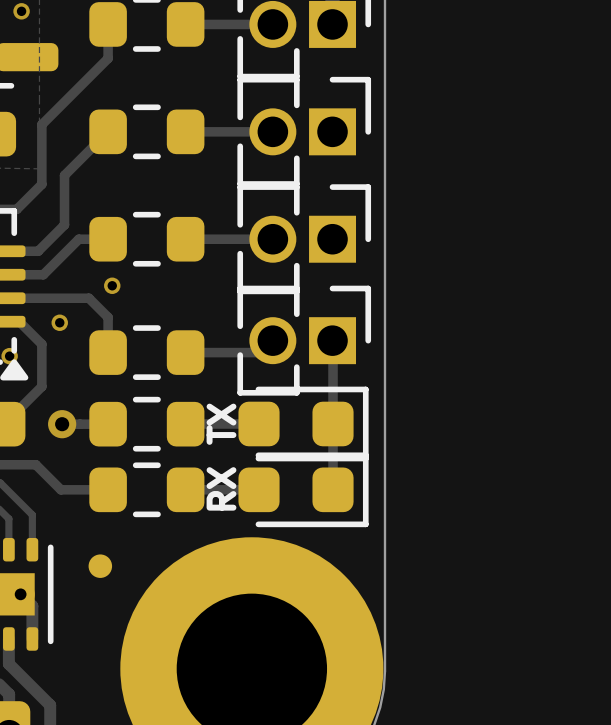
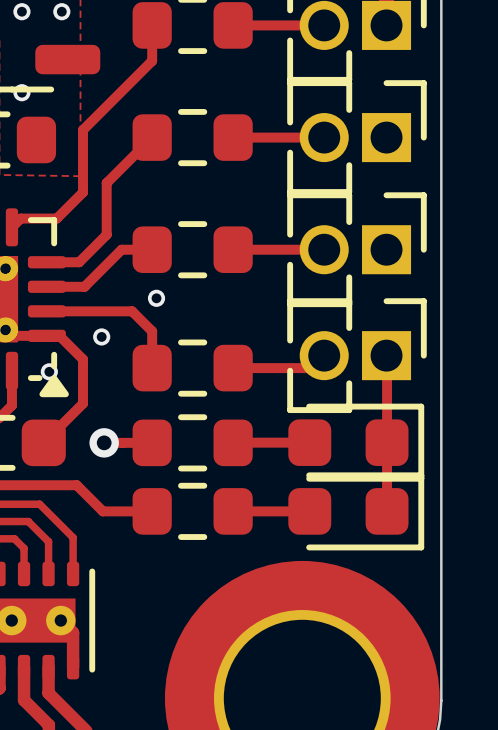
text: TX (221, 424) -> none
text: RX (221, 488) -> none
part: (100, 566) -> none

